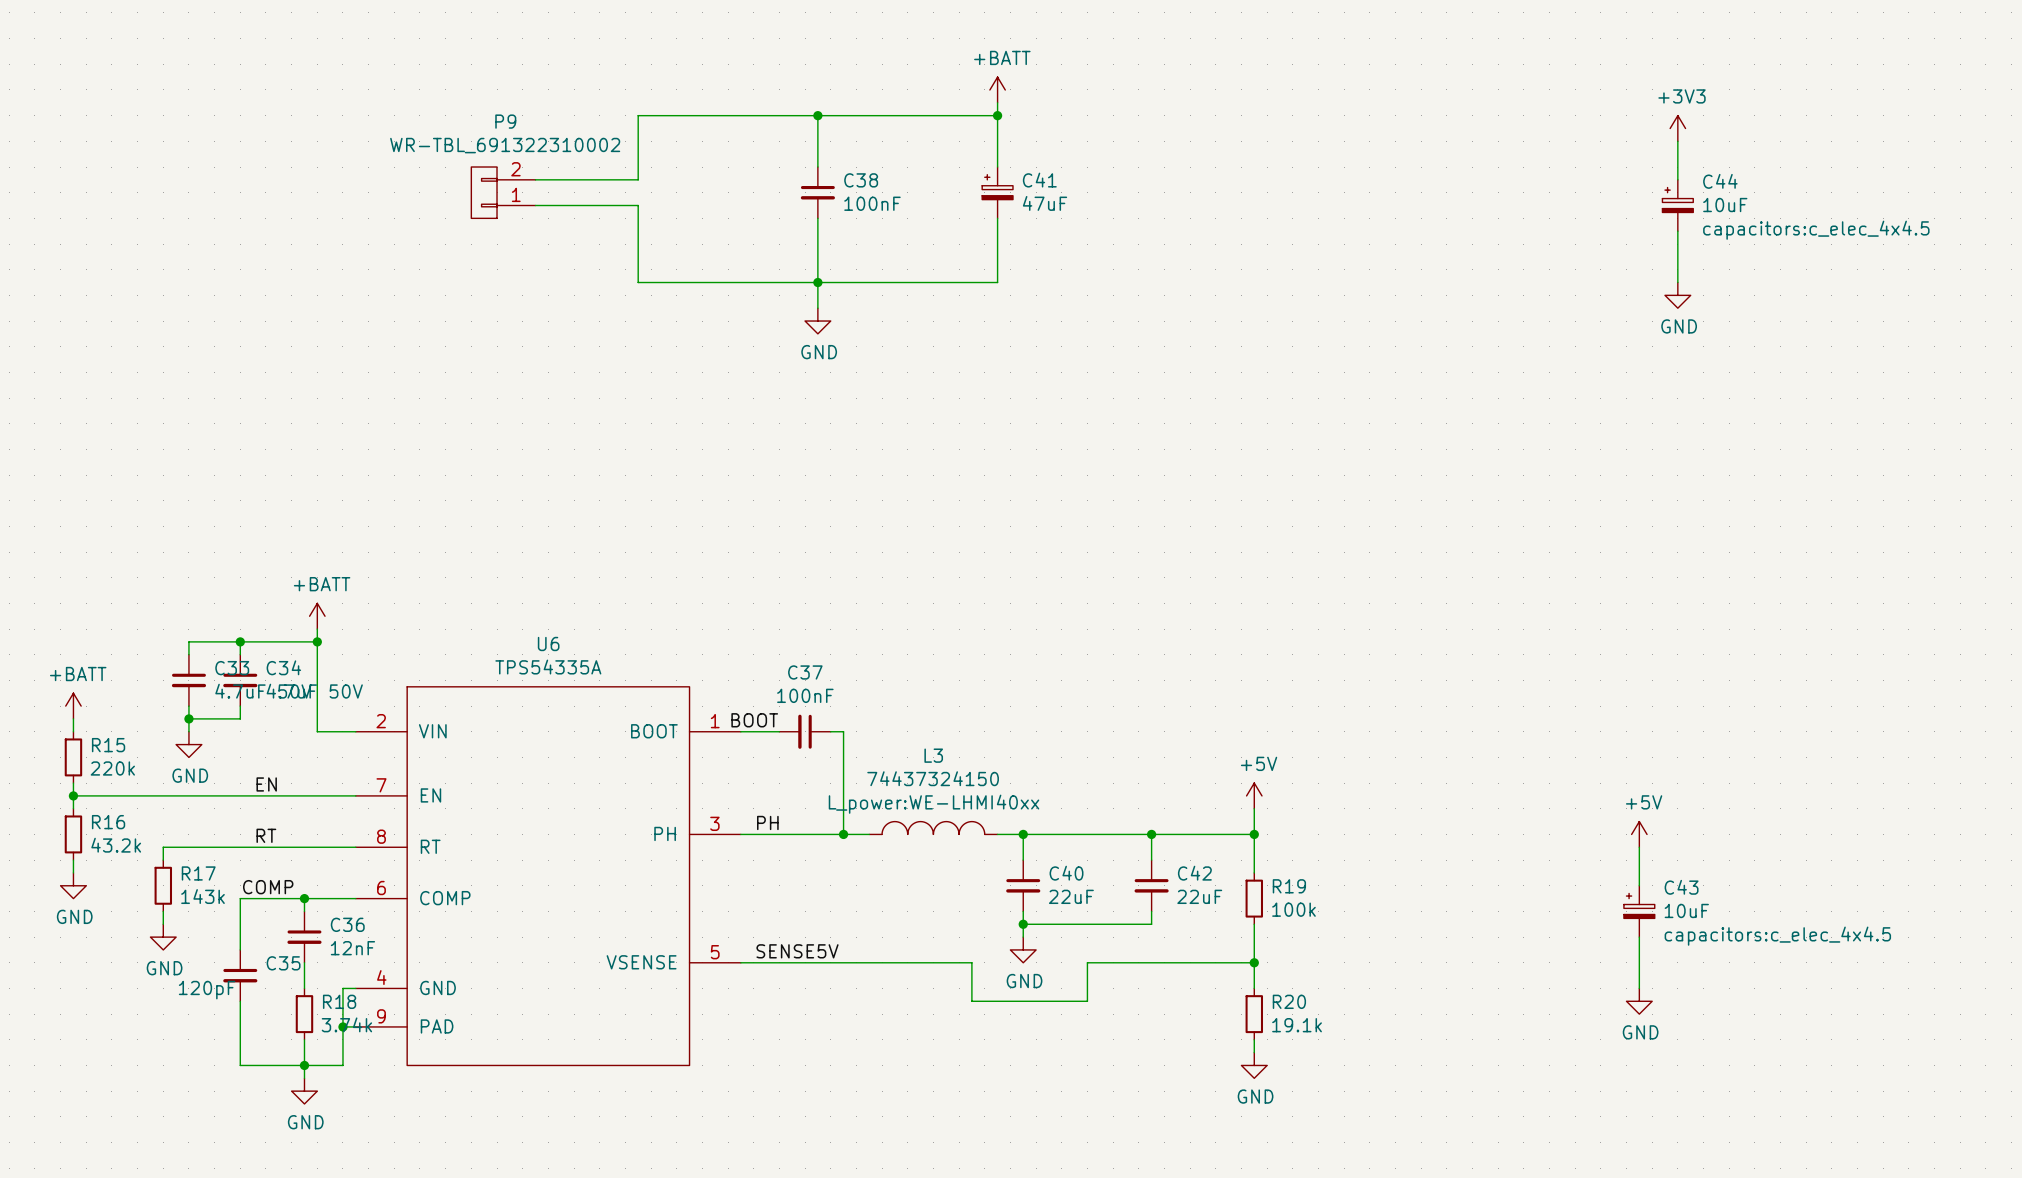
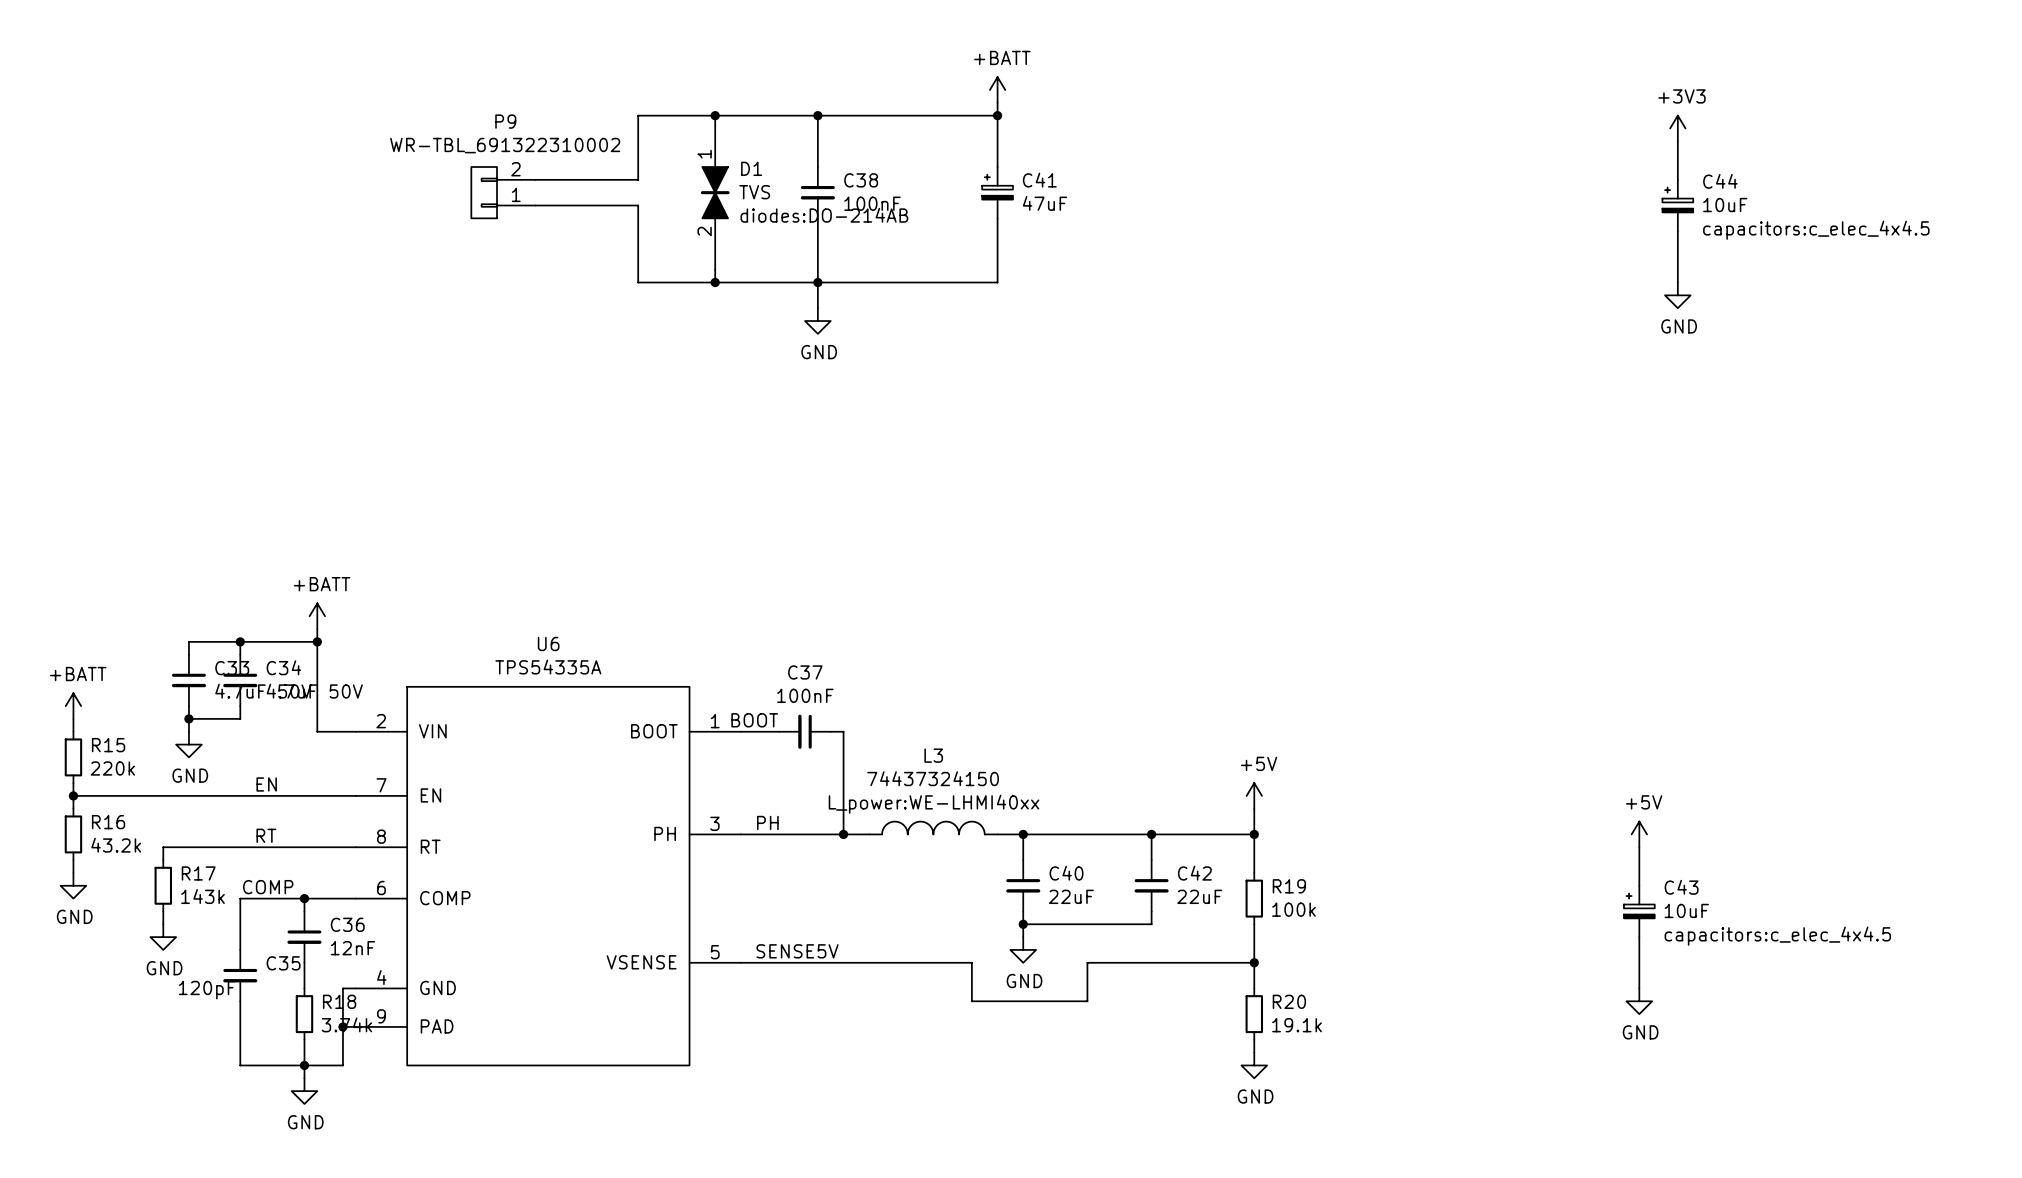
junction: none -> (715, 115)
D1: none -> TVS (715, 192)
wire: none -> (715, 269) (715, 282)
junction: none -> (715, 282)

